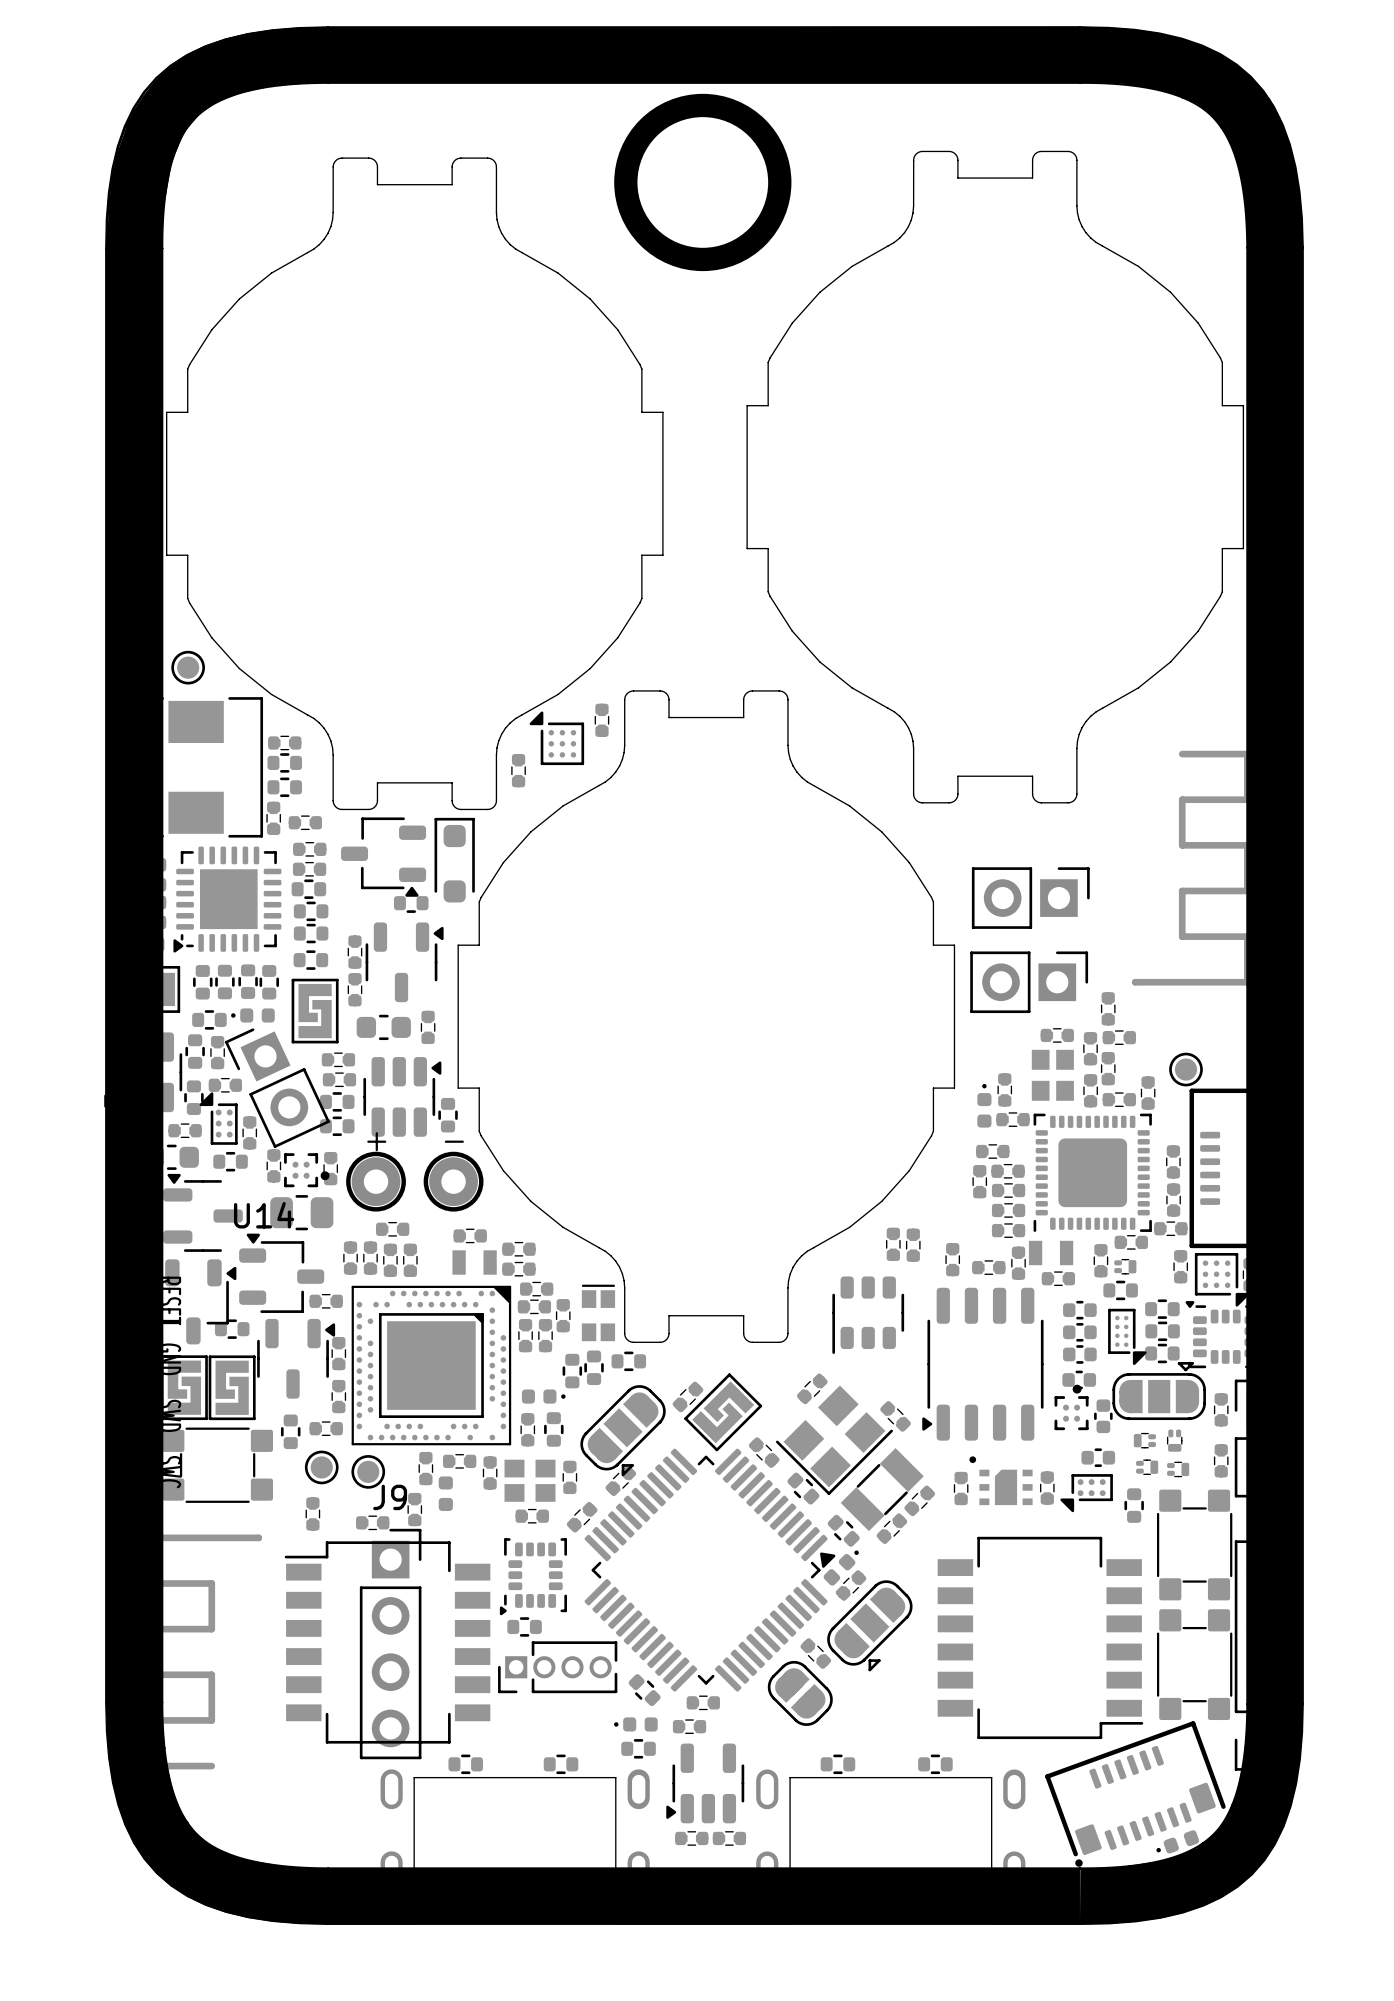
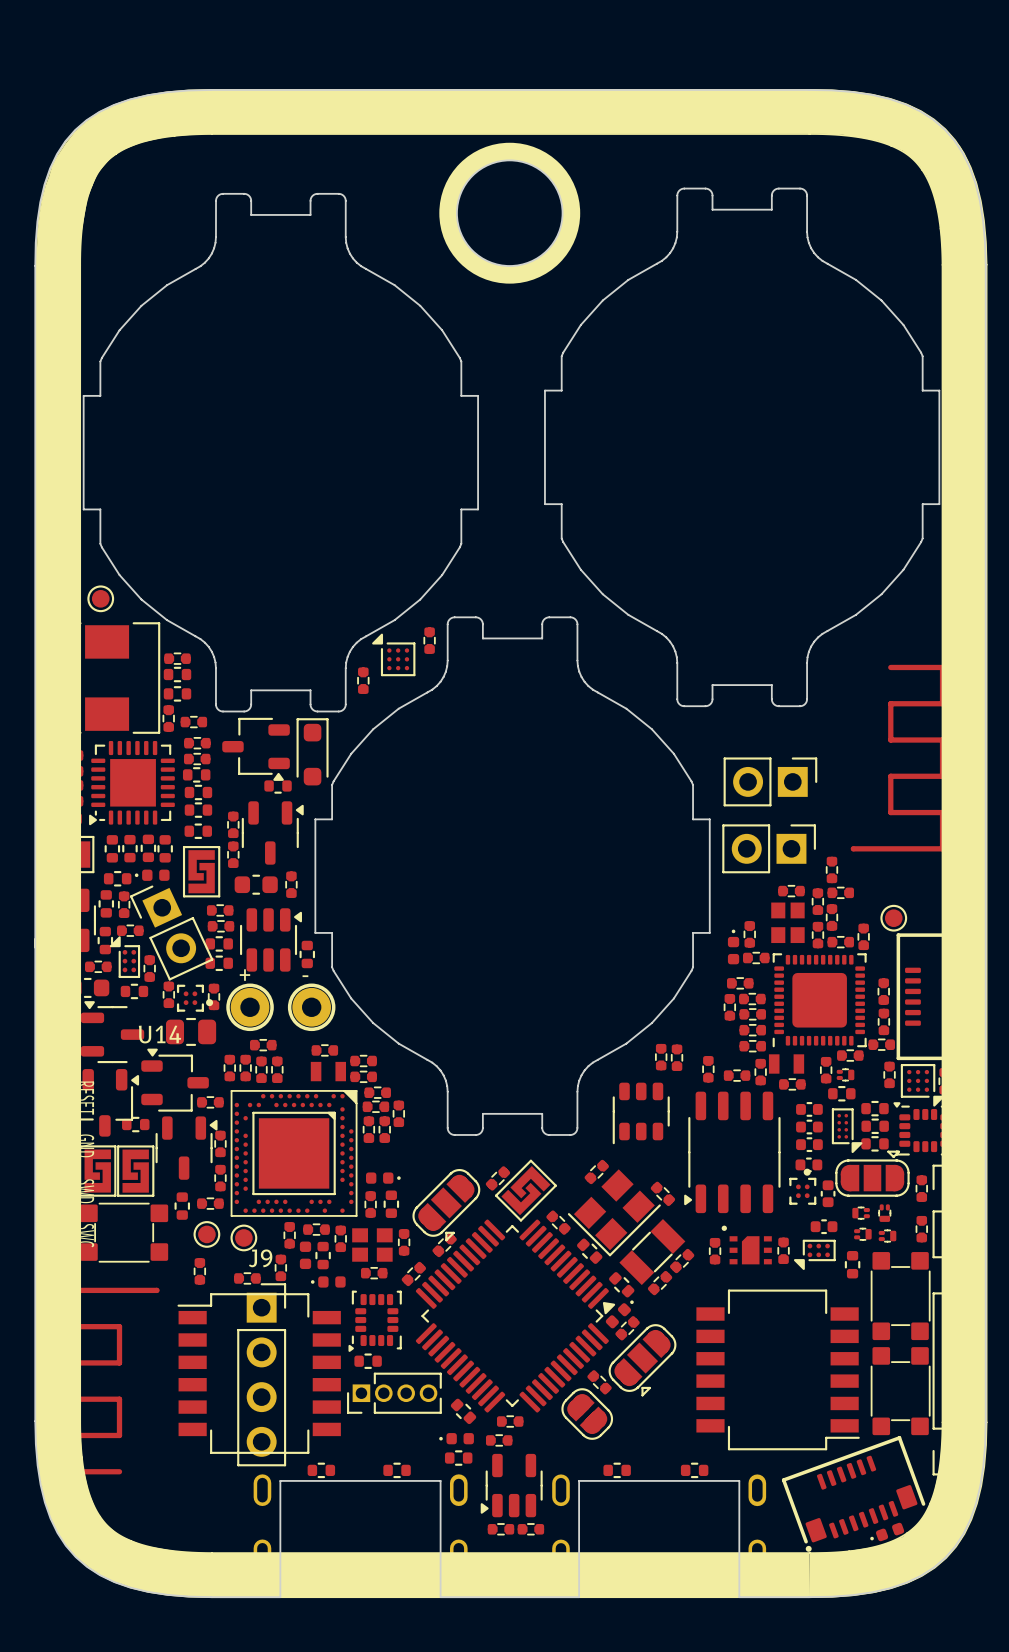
part: (598, 1312) -> none
part: (628, 1361) -> none
part: (594, 1367) -> none
part: (572, 1371) -> none
part: none -> (323, 1255)
part: none -> (328, 1281)

